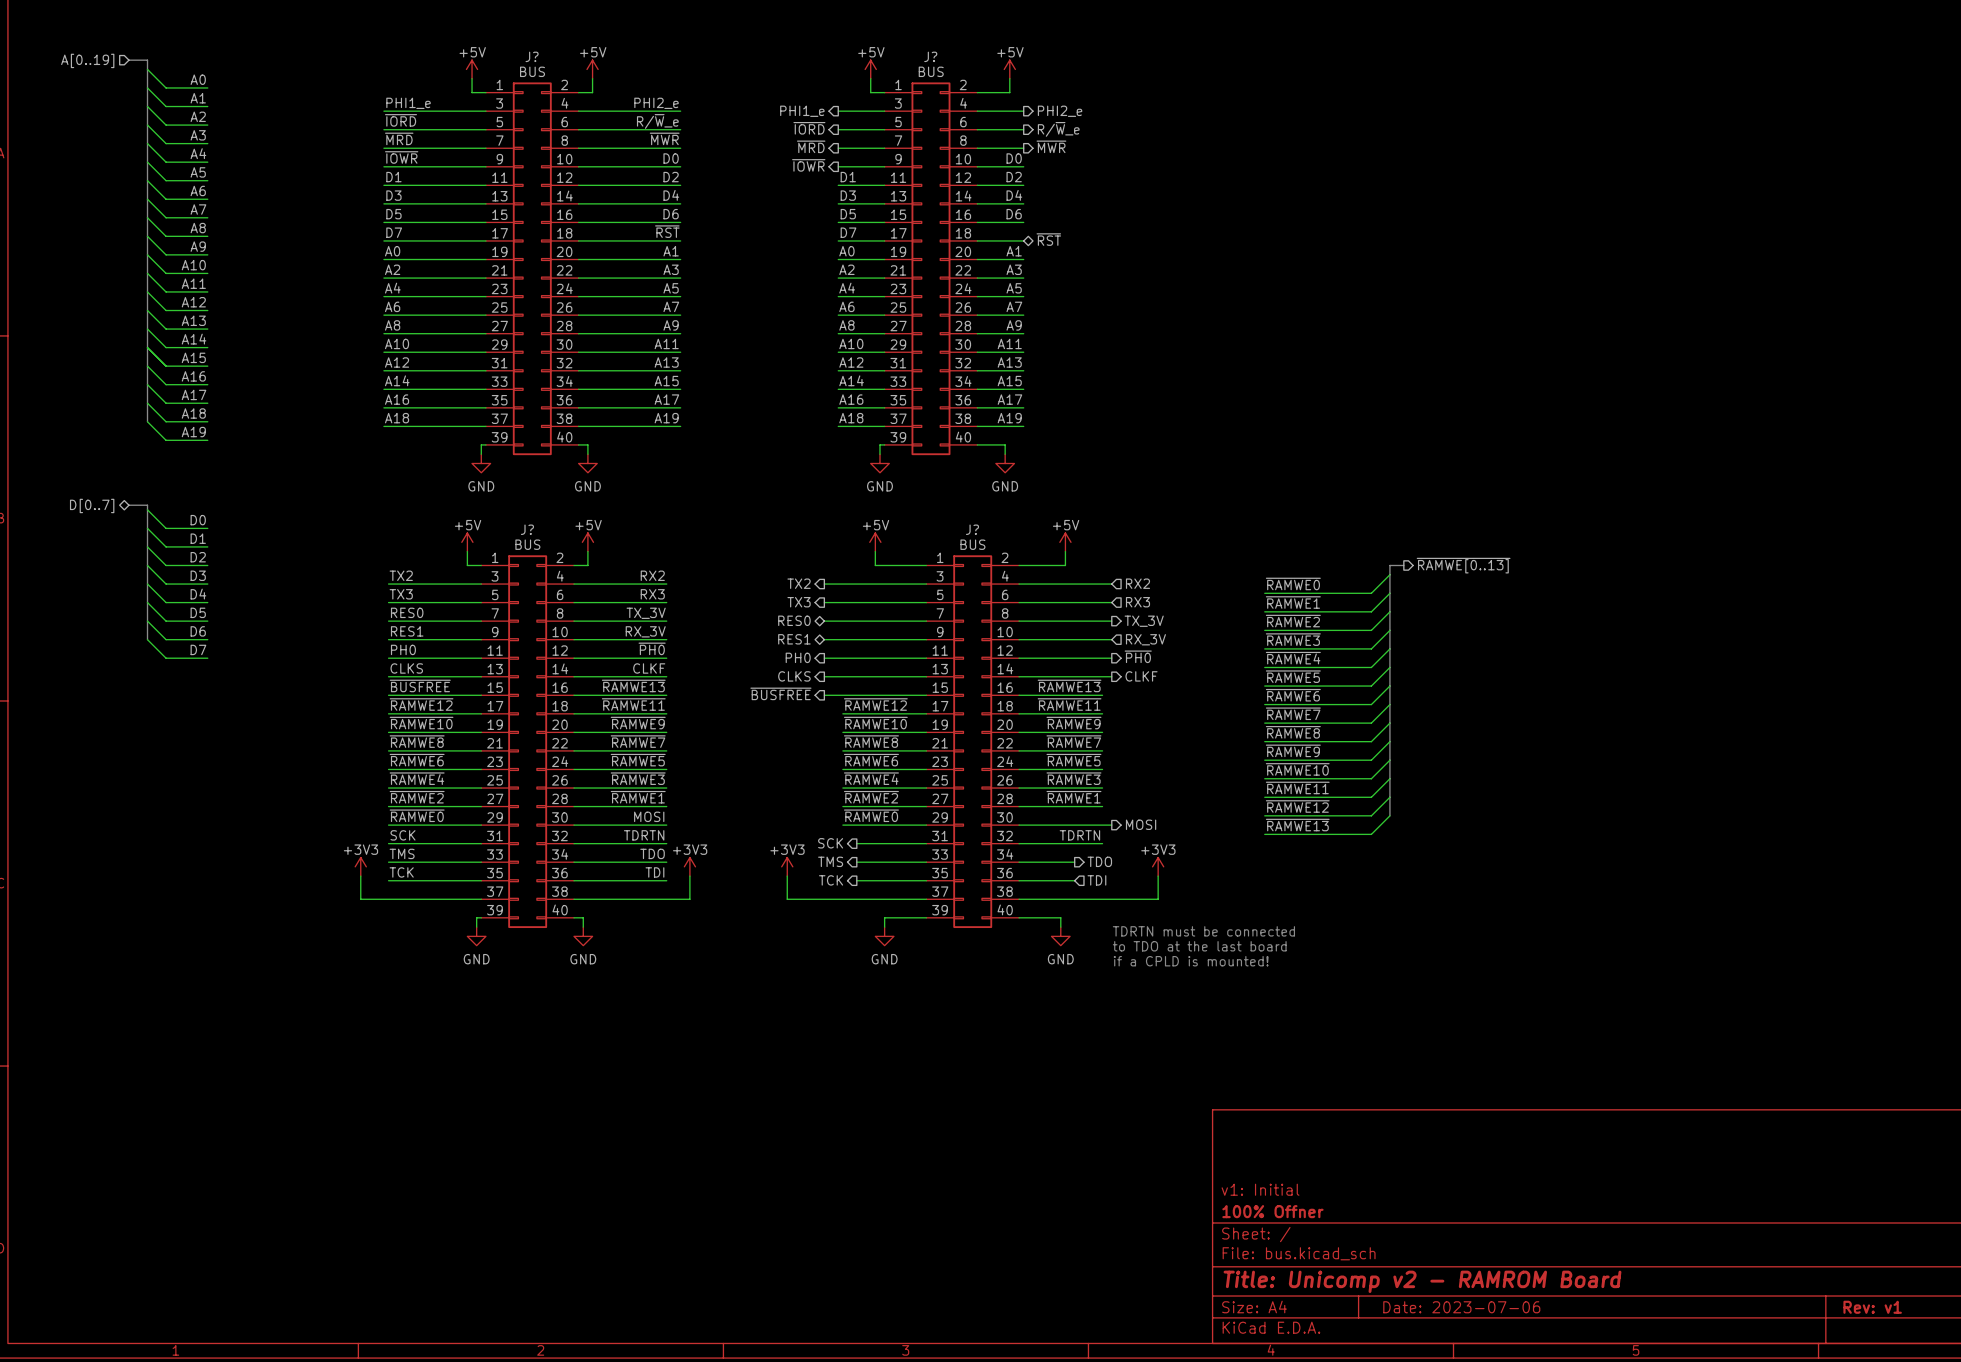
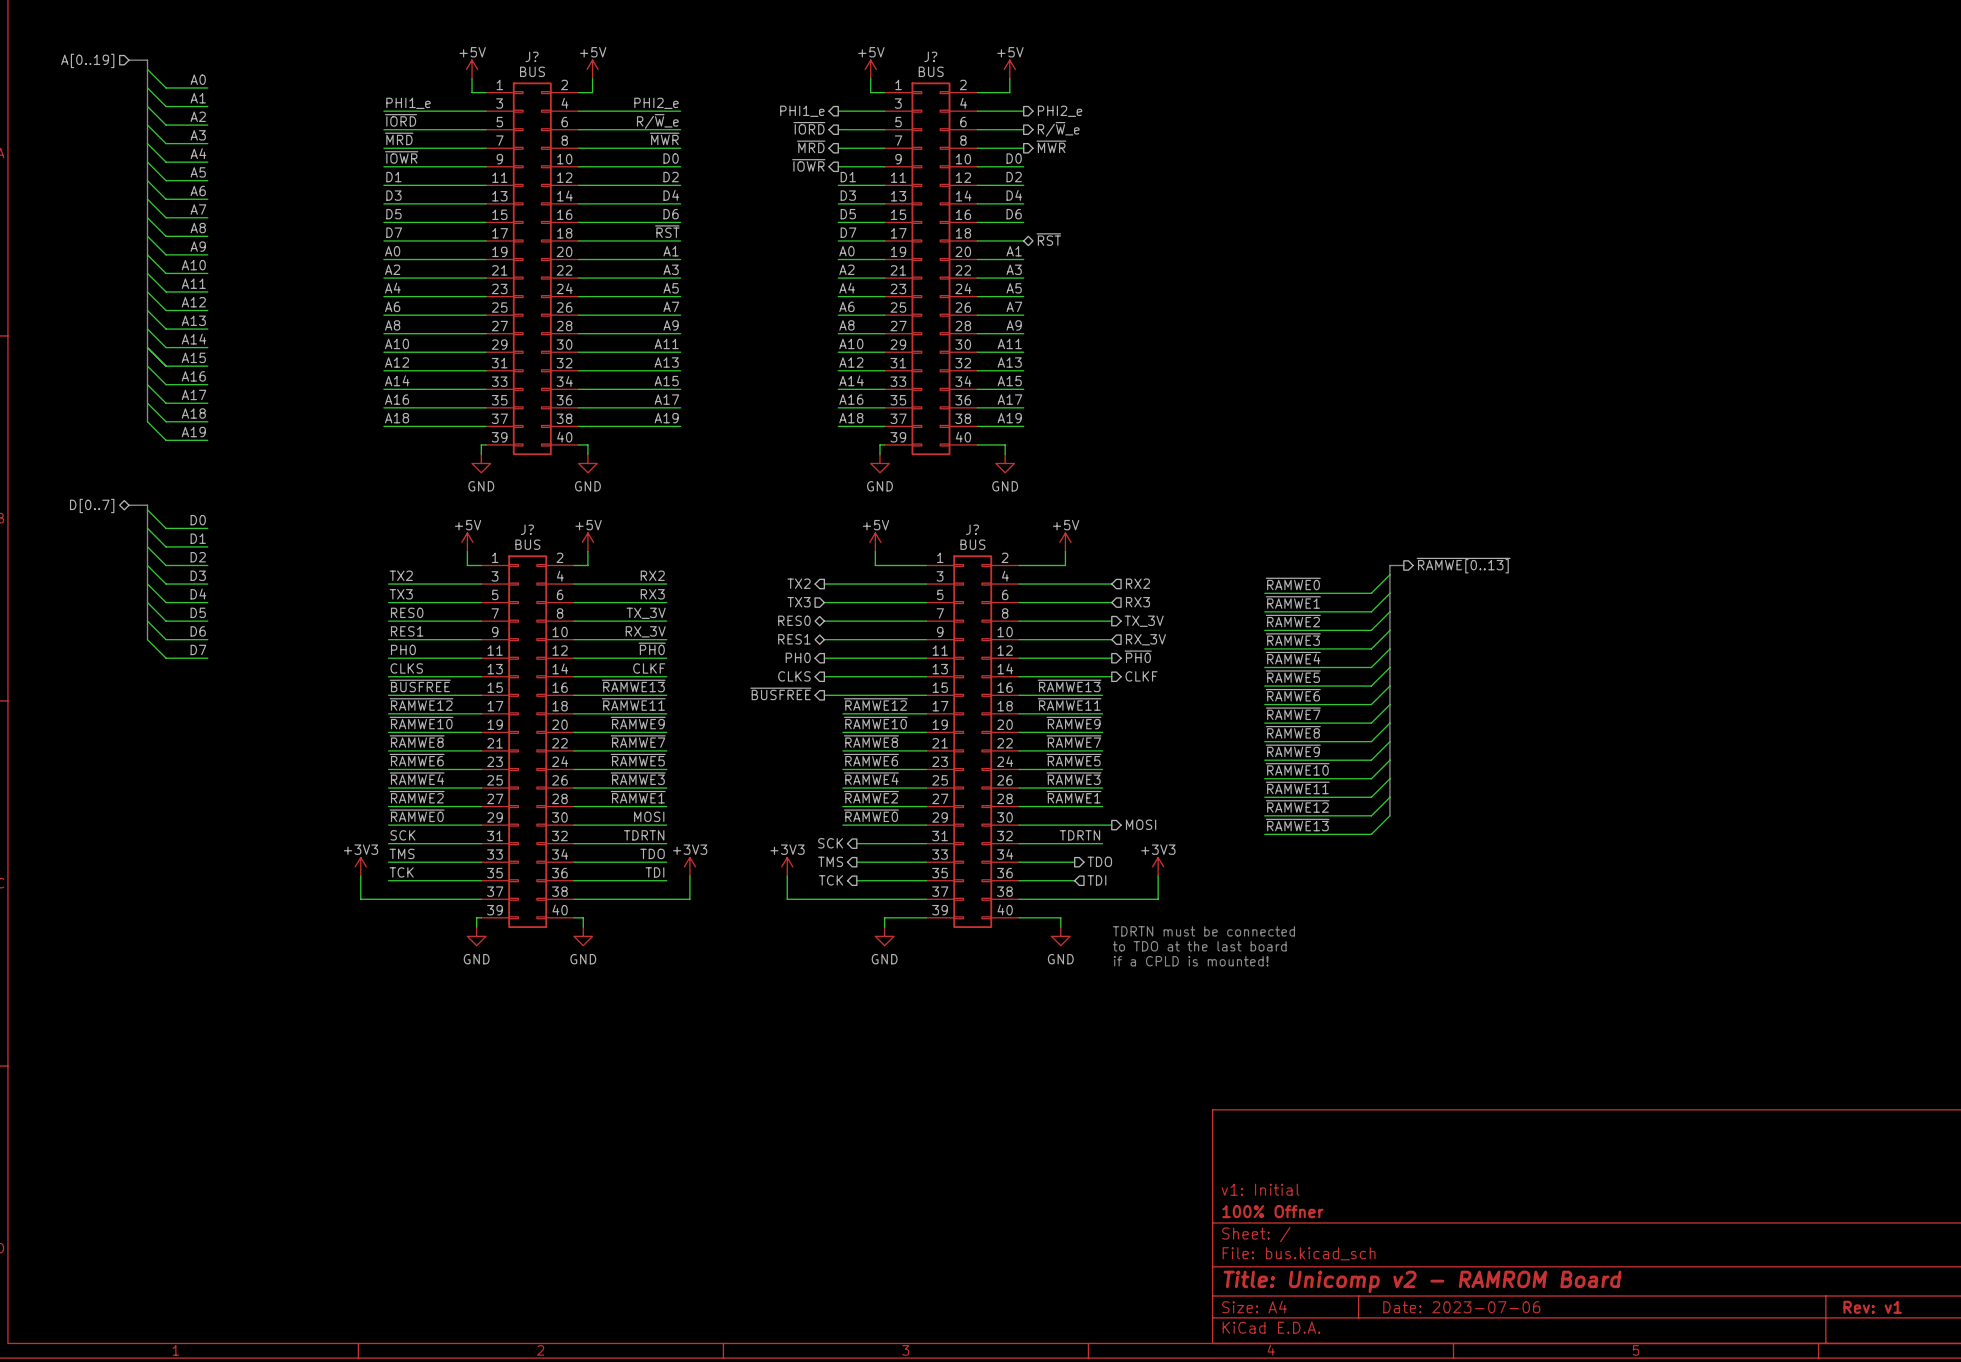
hierarchical label shape: output (799, 602) -> input (799, 602)

